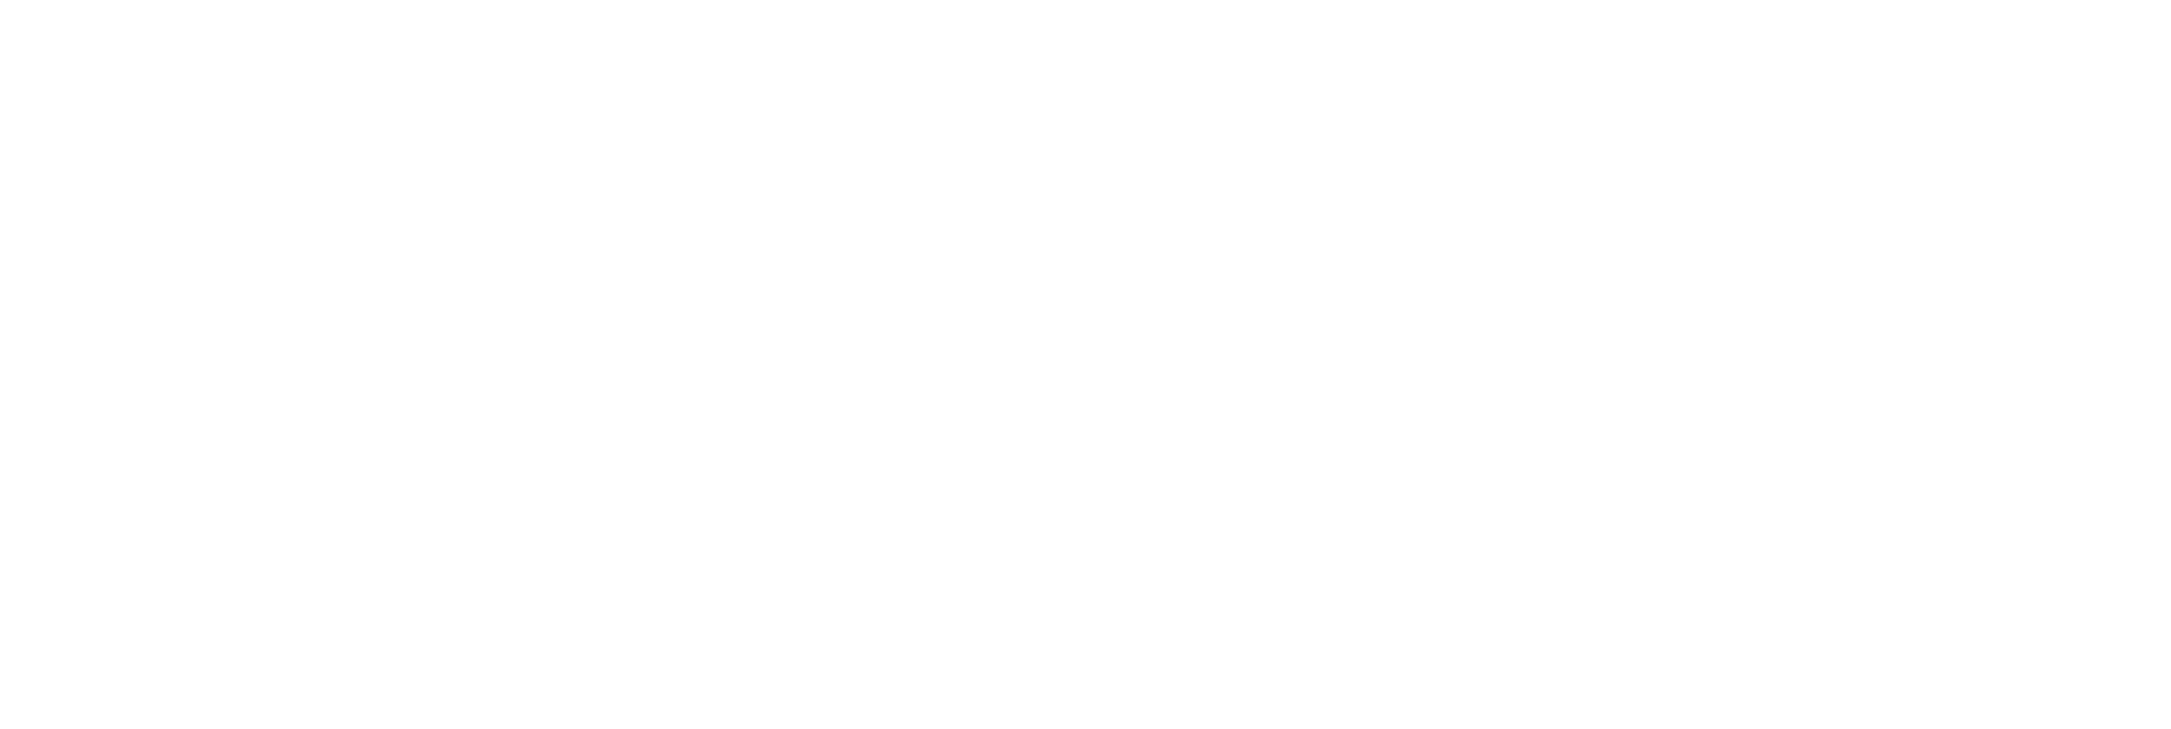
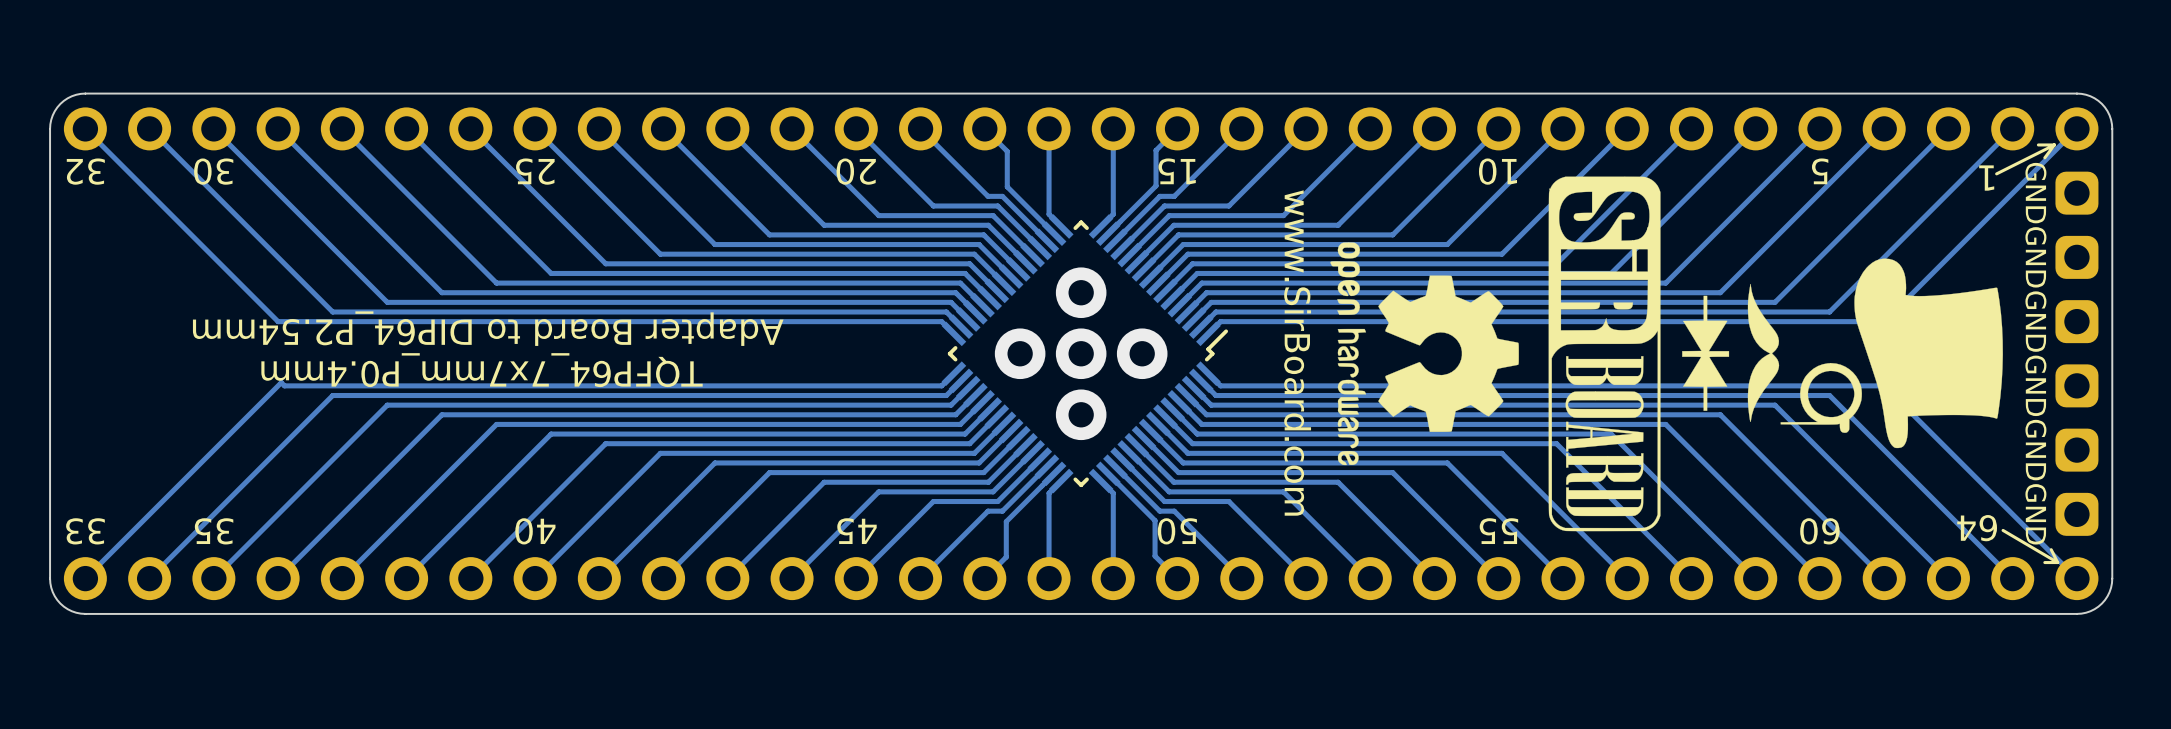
board edge: none -> (85, 93) (71, 96) (60, 103) (52, 115) (50, 128) (50, 578) (51, 587) (57, 600) (63, 606) (76, 612) (2076, 613) (2090, 611) (2098, 606) (2104, 600) (2111, 587) (2112, 128) (2109, 115) (2104, 107) (2094, 98) (2086, 94) (85, 93)
track: none -> (85, 128) (278, 321) (941, 321) (953, 333)
track: none -> (149, 128) (332, 311) (946, 311) (961, 326)
track: none -> (213, 128) (387, 302) (951, 302) (968, 319)
track: none -> (278, 128) (441, 292) (955, 292) (975, 312)
track: none -> (342, 128) (496, 283) (960, 283) (982, 305)
track: none -> (406, 128) (551, 273) (965, 273) (989, 298)
track: none -> (470, 128) (605, 263) (969, 263) (996, 290)
track: none -> (535, 128) (660, 254) (974, 254) (1003, 283)
track: none -> (599, 128) (714, 244) (979, 244) (1011, 276)
track: none -> (663, 128) (769, 234) (983, 234) (1018, 269)
track: none -> (727, 128) (824, 225) (988, 225) (1025, 262)
track: none -> (792, 128) (878, 215) (993, 215) (1032, 255)
track: none -> (856, 128) (933, 205) (997, 205) (1039, 247)
track: none -> (920, 128) (988, 196) (1002, 196) (1046, 240)
track: none -> (984, 128) (1007, 151) (1007, 186) (1054, 233)
track: none -> (1049, 128) (1049, 214) (1061, 226)
part: none -> (1081, 128)
track: none -> (1113, 128) (1113, 214) (1101, 226)
track: none -> (1177, 128) (1156, 150) (1156, 185) (1108, 233)
track: none -> (1241, 128) (1174, 196) (1159, 196) (1115, 240)
track: none -> (1306, 128) (1228, 205) (1164, 205) (1122, 247)
track: none -> (1370, 128) (1283, 215) (1169, 215) (1129, 255)
track: none -> (1434, 128) (1338, 225) (1173, 225) (1136, 262)
track: none -> (1498, 128) (1392, 234) (1178, 234) (1144, 269)
track: none -> (1562, 128) (1447, 244) (1183, 244) (1151, 276)
track: none -> (1627, 128) (1501, 254) (1187, 254) (1158, 283)
track: none -> (1691, 128) (1556, 263) (1192, 263) (1165, 290)
track: none -> (1755, 128) (1611, 273) (1197, 273) (1172, 298)
track: none -> (1819, 128) (1665, 283) (1201, 283) (1179, 305)
track: none -> (1884, 128) (1720, 292) (1206, 292) (1186, 312)
track: none -> (1948, 128) (1775, 302) (1211, 302) (1194, 319)
track: none -> (2012, 128) (1829, 311) (1215, 311) (1201, 326)
track: none -> (2076, 128) (1881, 324) (1877, 321) (1220, 321) (1208, 333)
line: none -> (2054, 144) (2044, 157)
line: none -> (2054, 144) (2038, 144)
line: none -> (2054, 144) (1996, 173)
text: none -> 32 (85, 171)
text: none -> 30 (213, 171)
text: none -> 25 (535, 171)
text: none -> 20 (856, 171)
text: none -> 15 (1177, 171)
text: none -> 10 (1498, 171)
text: none -> 5 (1820, 171)
drawing: none -> [1330, 176, 2003, 532]
text: none -> 1 (1986, 178)
text: none -> GND (2035, 193)
text: none -> GND (2035, 257)
via: none -> (1081, 292)
text: none -> GND (2035, 321)
text: none -> Adapter Board to DIP64_P2.54mm (488, 328)
text: none -> www.SirBoard.com (1297, 353)
via: none -> (1020, 353)
via: none -> (1081, 353)
part: none -> (1084, 353)
via: none -> (1142, 353)
part: none -> (2076, 353)
text: none -> TQFP64_7x7mm_P0.4mm (482, 370)
track: none -> (953, 373) (941, 385) (284, 385) (281, 382) (85, 578)
track: none -> (1208, 373) (1220, 385) (1884, 385) (2076, 578)
track: none -> (961, 380) (946, 395) (332, 395) (149, 578)
track: none -> (1201, 380) (1215, 395) (1829, 395) (2012, 578)
text: none -> GND (2035, 385)
track: none -> (968, 388) (951, 405) (387, 405) (213, 578)
track: none -> (1194, 388) (1211, 405) (1775, 405) (1948, 578)
track: none -> (975, 395) (955, 414) (441, 414) (278, 578)
track: none -> (1186, 395) (1206, 414) (1720, 414) (1884, 578)
track: none -> (982, 402) (960, 424) (496, 424) (342, 578)
track: none -> (1179, 402) (1201, 424) (1665, 424) (1819, 578)
track: none -> (989, 409) (965, 434) (551, 434) (406, 578)
track: none -> (1172, 409) (1197, 434) (1611, 434) (1755, 578)
via: none -> (1081, 414)
track: none -> (996, 416) (969, 443) (605, 443) (470, 578)
track: none -> (1165, 416) (1192, 443) (1556, 443) (1691, 578)
track: none -> (1003, 423) (974, 453) (660, 453) (535, 578)
track: none -> (1158, 423) (1187, 453) (1501, 453) (1627, 578)
track: none -> (1011, 430) (979, 462) (714, 462) (599, 578)
track: none -> (1151, 430) (1183, 462) (1447, 462) (1562, 578)
track: none -> (1018, 438) (983, 472) (769, 472) (663, 578)
track: none -> (1144, 438) (1178, 472) (1392, 472) (1498, 578)
track: none -> (1025, 445) (988, 482) (824, 482) (727, 578)
track: none -> (1136, 445) (1173, 482) (1338, 482) (1434, 578)
text: none -> GND (2035, 450)
track: none -> (1032, 452) (993, 491) (878, 491) (792, 578)
track: none -> (1129, 452) (1169, 491) (1283, 491) (1370, 578)
track: none -> (1039, 459) (997, 501) (933, 501) (856, 578)
track: none -> (1122, 459) (1164, 501) (1228, 501) (1306, 578)
track: none -> (1046, 466) (1002, 511) (988, 511) (920, 578)
track: none -> (1115, 466) (1159, 511) (1174, 511) (1241, 578)
track: none -> (1054, 473) (1006, 521) (1006, 557) (984, 578)
track: none -> (1108, 473) (1155, 520) (1155, 556) (1177, 578)
track: none -> (1061, 481) (1049, 493) (1049, 578)
track: none -> (1101, 481) (1113, 493) (1113, 578)
text: none -> GND (2035, 514)
text: none -> 64 (1977, 528)
line: none -> (2003, 530) (2057, 562)
text: none -> 33 (85, 531)
text: none -> 35 (214, 531)
text: none -> 40 (535, 531)
text: none -> 45 (856, 531)
text: none -> 50 (1177, 531)
text: none -> 55 (1498, 531)
text: none -> 60 (1819, 531)
line: none -> (2051, 549) (2057, 562)
line: none -> (2057, 562) (2044, 562)
part: none -> (1081, 578)

